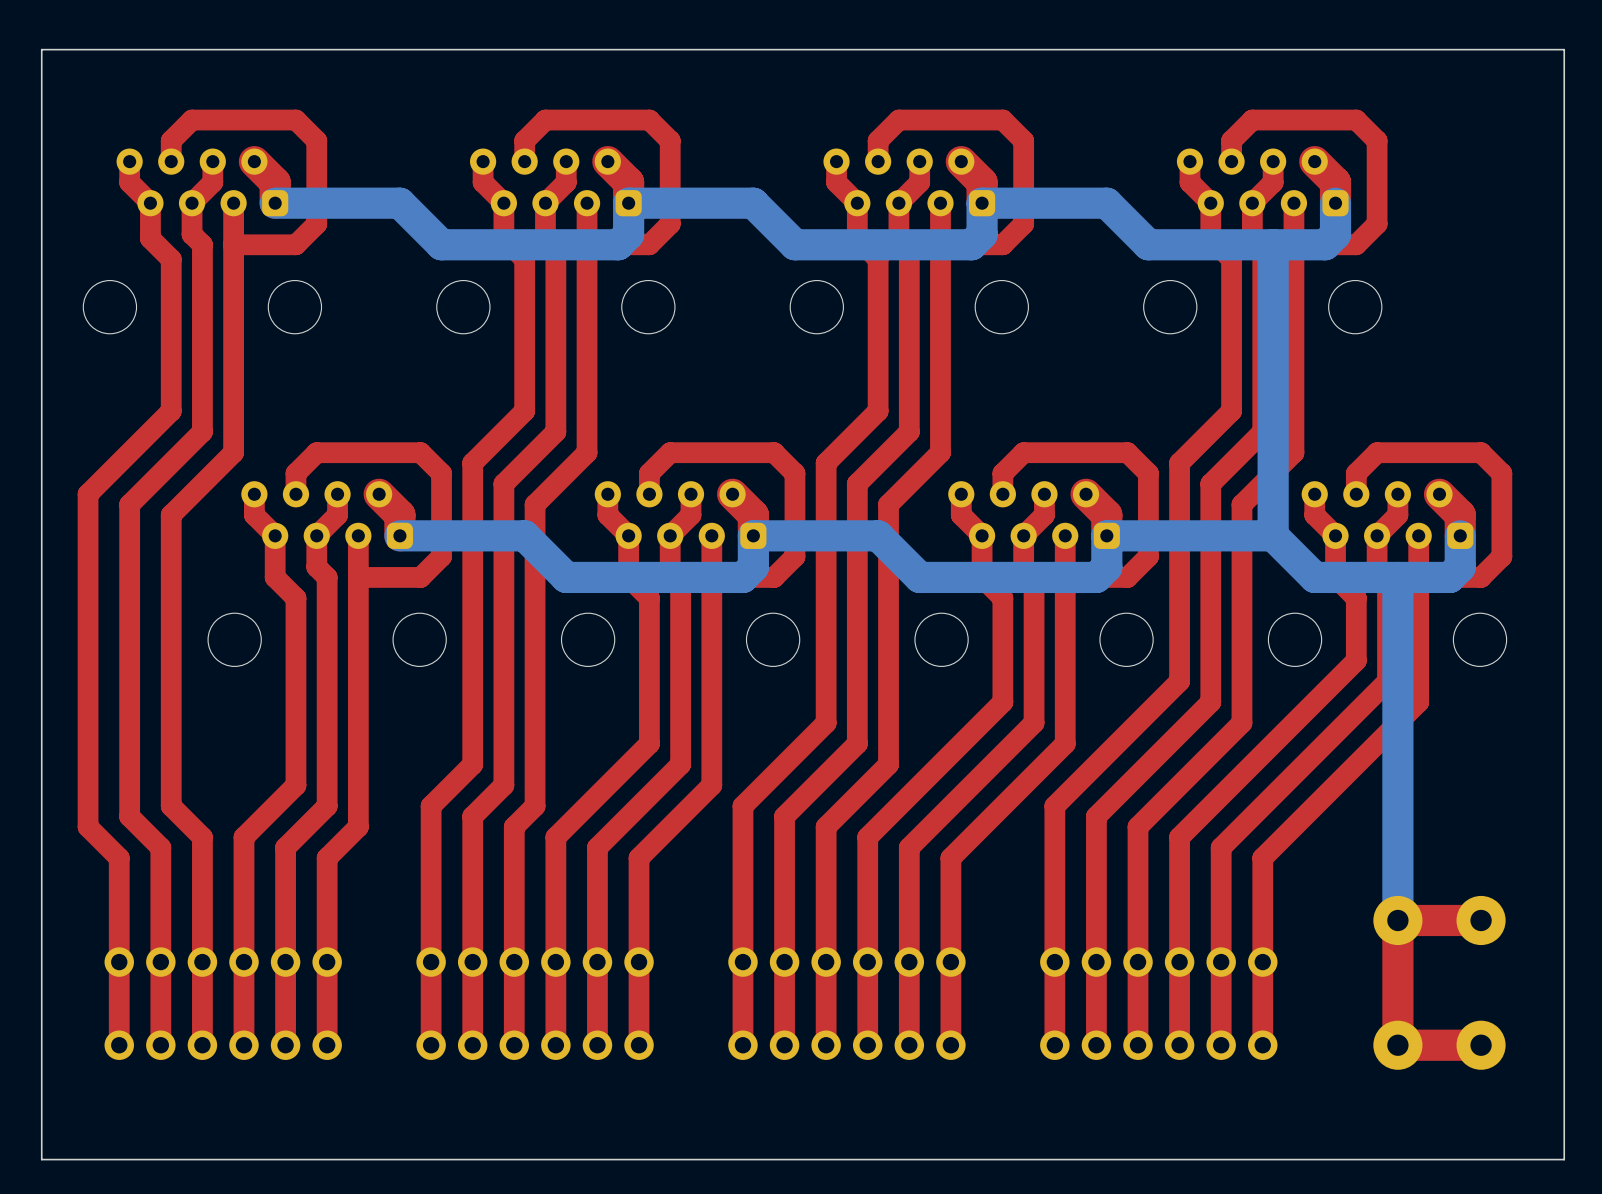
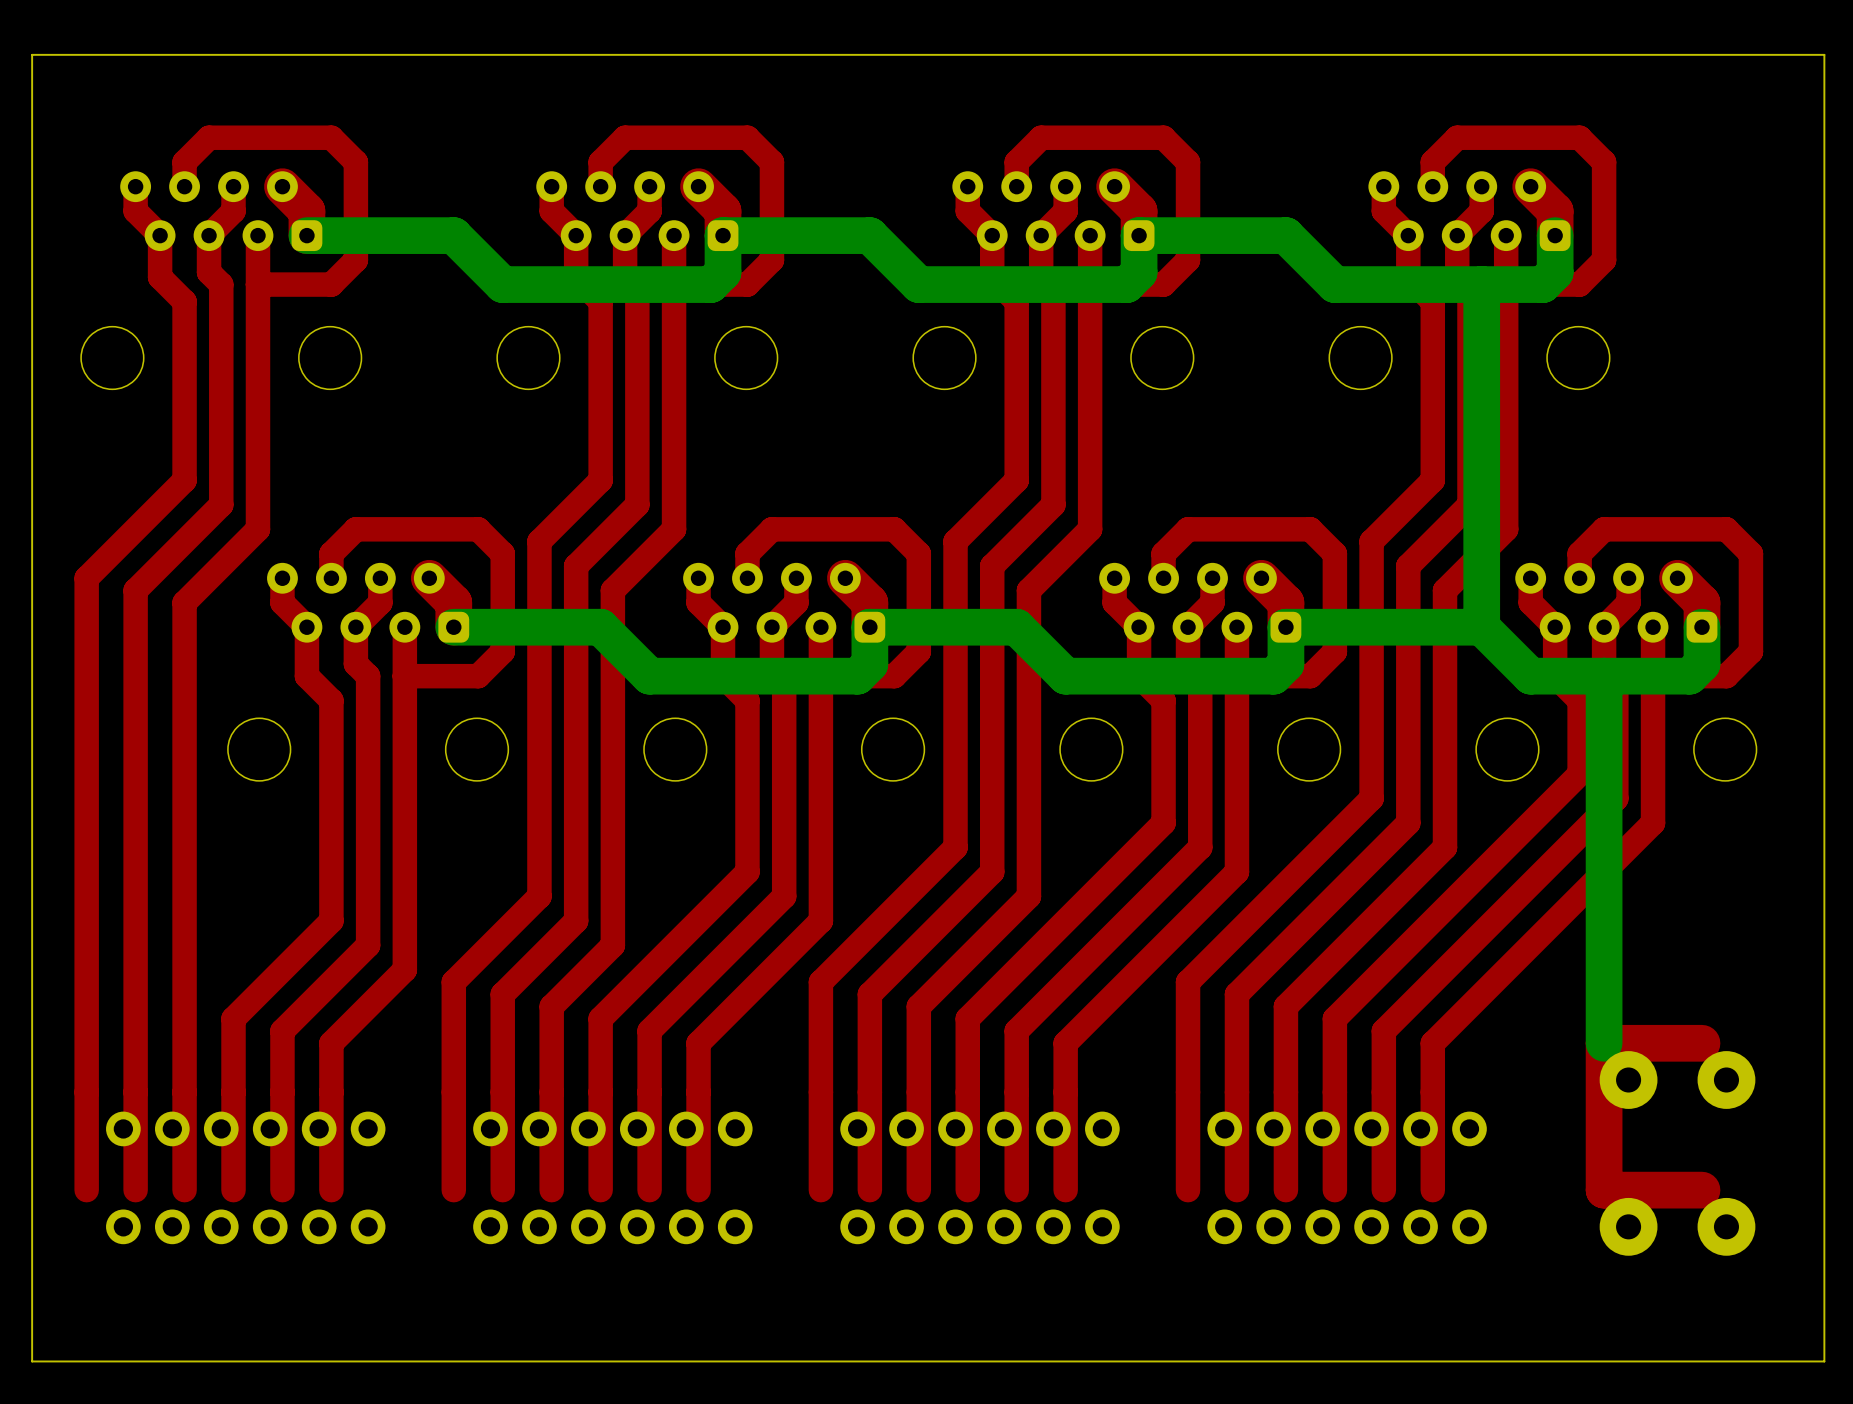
bottom track: none -> (1604, 676) (1604, 1043)
bottom track: (1397, 577) (1397, 920) -> none
top track: (171, 806) (202, 837) (202, 1045) -> (184, 945) (184, 1190)
top track: (431, 806) (431, 1045) -> (490, 945) (453, 982) (453, 1190)
top track: (742, 806) (742, 1045) -> (857, 945) (820, 982) (820, 1190)
top track: (1054, 806) (1054, 1045) -> (1224, 945) (1188, 982) (1188, 1190)
top track: (129, 816) (160, 847) (160, 1045) -> (135, 957) (135, 1190)
top track: (472, 816) (472, 1045) -> (539, 957) (502, 994) (502, 1190)
top track: (784, 816) (784, 1045) -> (906, 957) (869, 994) (869, 1190)
top track: (1096, 816) (1096, 1045) -> (1273, 957) (1236, 994) (1236, 1190)
top track: (88, 826) (119, 858) (119, 1045) -> (86, 969) (86, 1190)
top track: (514, 826) (514, 1045) -> (588, 969) (551, 1006) (551, 1190)
top track: (826, 826) (826, 1045) -> (955, 969) (918, 1006) (918, 1190)
top track: (1138, 826) (1138, 1045) -> (1322, 969) (1285, 1006) (1285, 1190)
top track: (244, 837) (244, 1045) -> (270, 982) (233, 1018) (233, 1190)
top track: (555, 837) (555, 1045) -> (637, 982) (600, 1018) (600, 1190)
top track: (867, 837) (867, 1045) -> (1004, 982) (967, 1018) (967, 1190)
top track: (1179, 837) (1179, 1045) -> (1371, 982) (1334, 1018) (1334, 1190)
top track: (285, 847) (285, 1045) -> (319, 994) (282, 1031) (282, 1190)
top track: (597, 847) (597, 1045) -> (686, 994) (649, 1031) (649, 1190)
top track: (909, 847) (909, 1045) -> (1053, 994) (1016, 1031) (1016, 1190)
top track: (1221, 847) (1221, 1045) -> (1420, 994) (1383, 1031) (1383, 1190)
top track: (327, 858) (327, 1045) -> (368, 1006) (331, 1043) (331, 1190)
top track: (639, 858) (639, 1045) -> (735, 1006) (698, 1043) (698, 1190)
top track: (950, 858) (950, 1045) -> (1102, 1006) (1065, 1043) (1065, 1190)
top track: (1262, 858) (1262, 1045) -> (1469, 1006) (1432, 1043) (1432, 1190)
top track: (1481, 920) (1397, 920) (1397, 1045) (1481, 1045) -> (1701, 1043) (1604, 1043) (1604, 1190) (1701, 1190)

